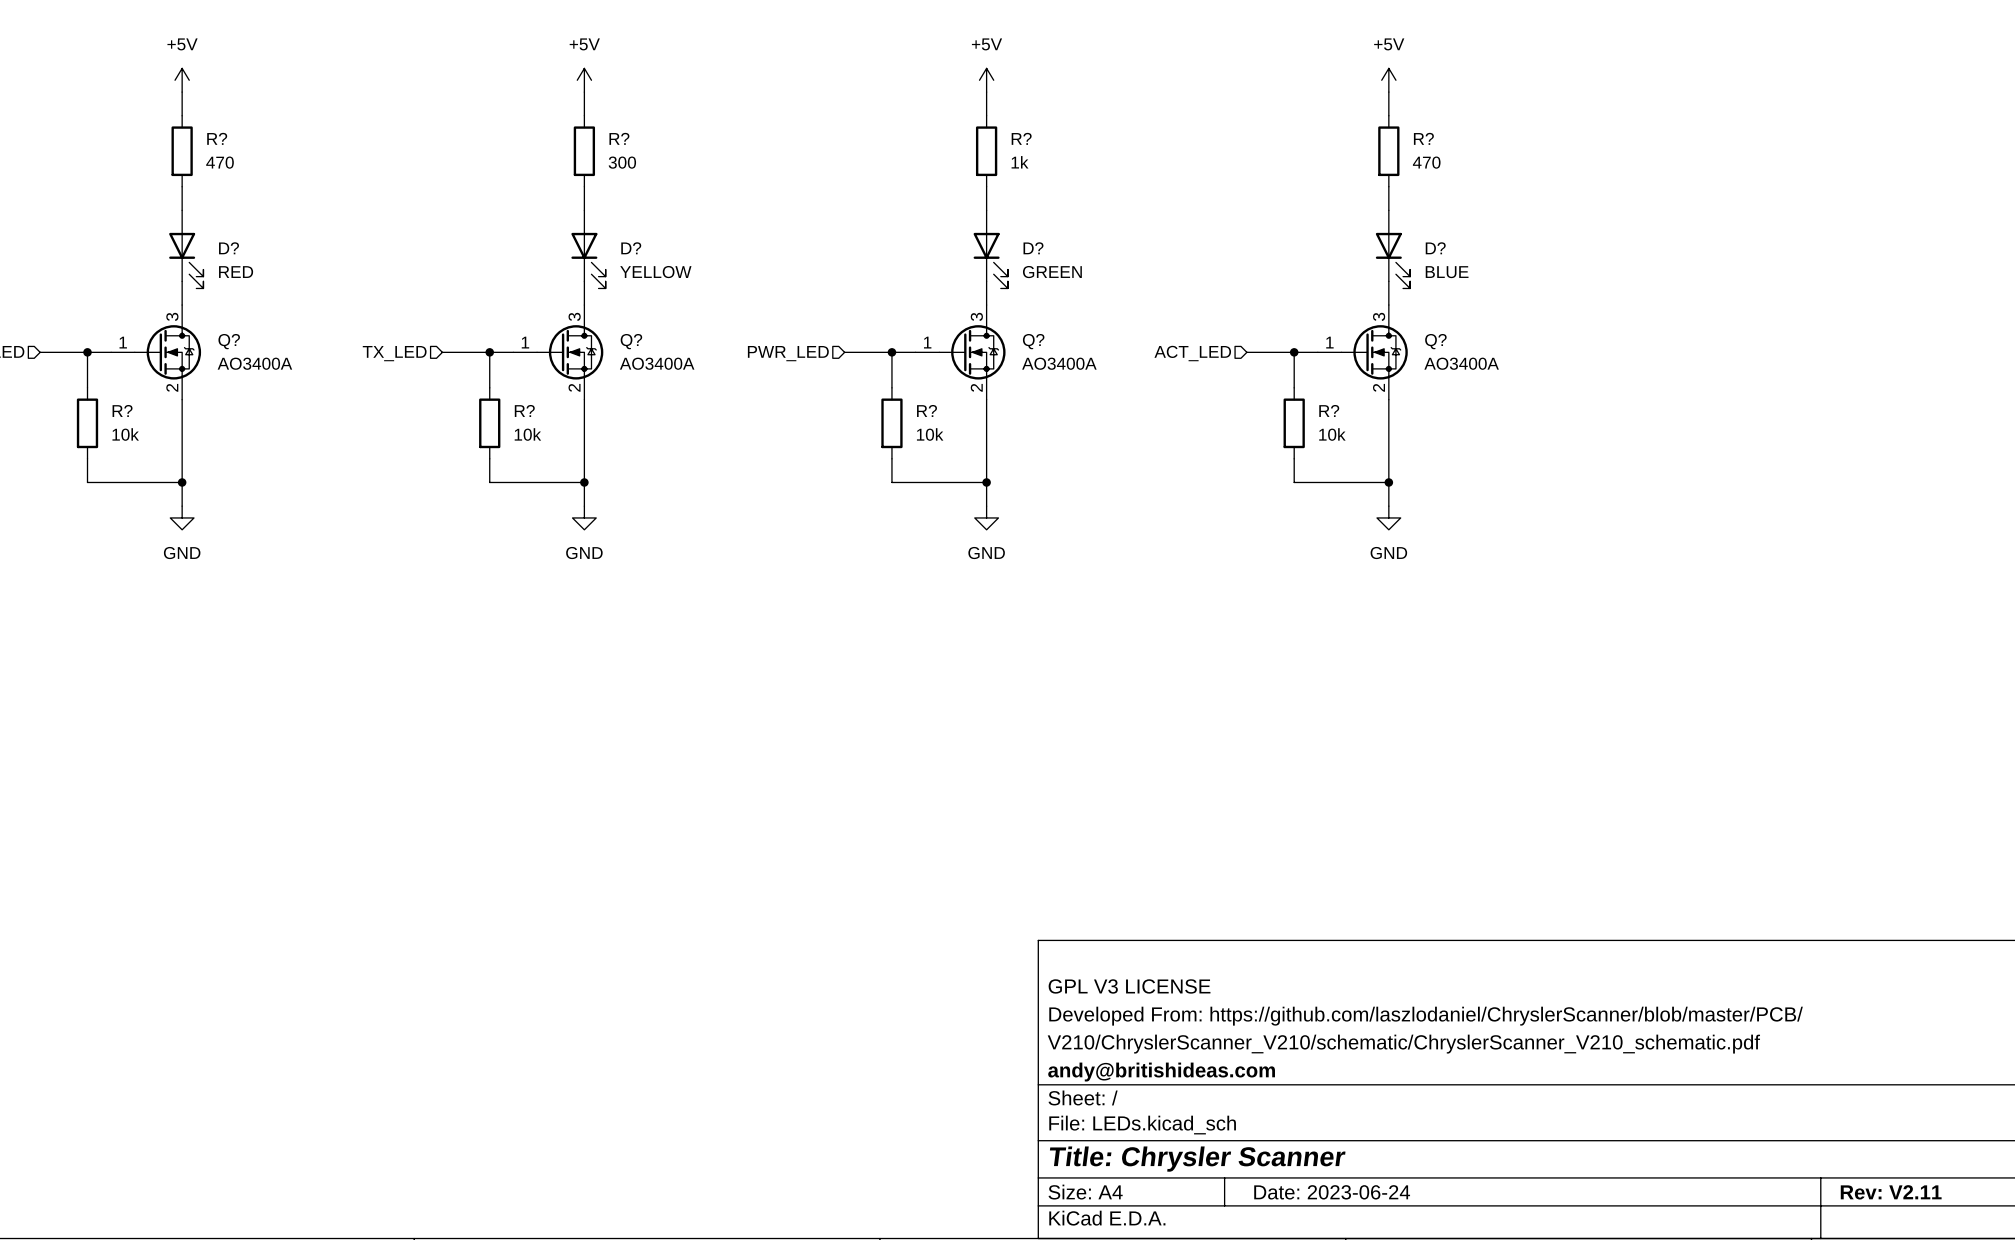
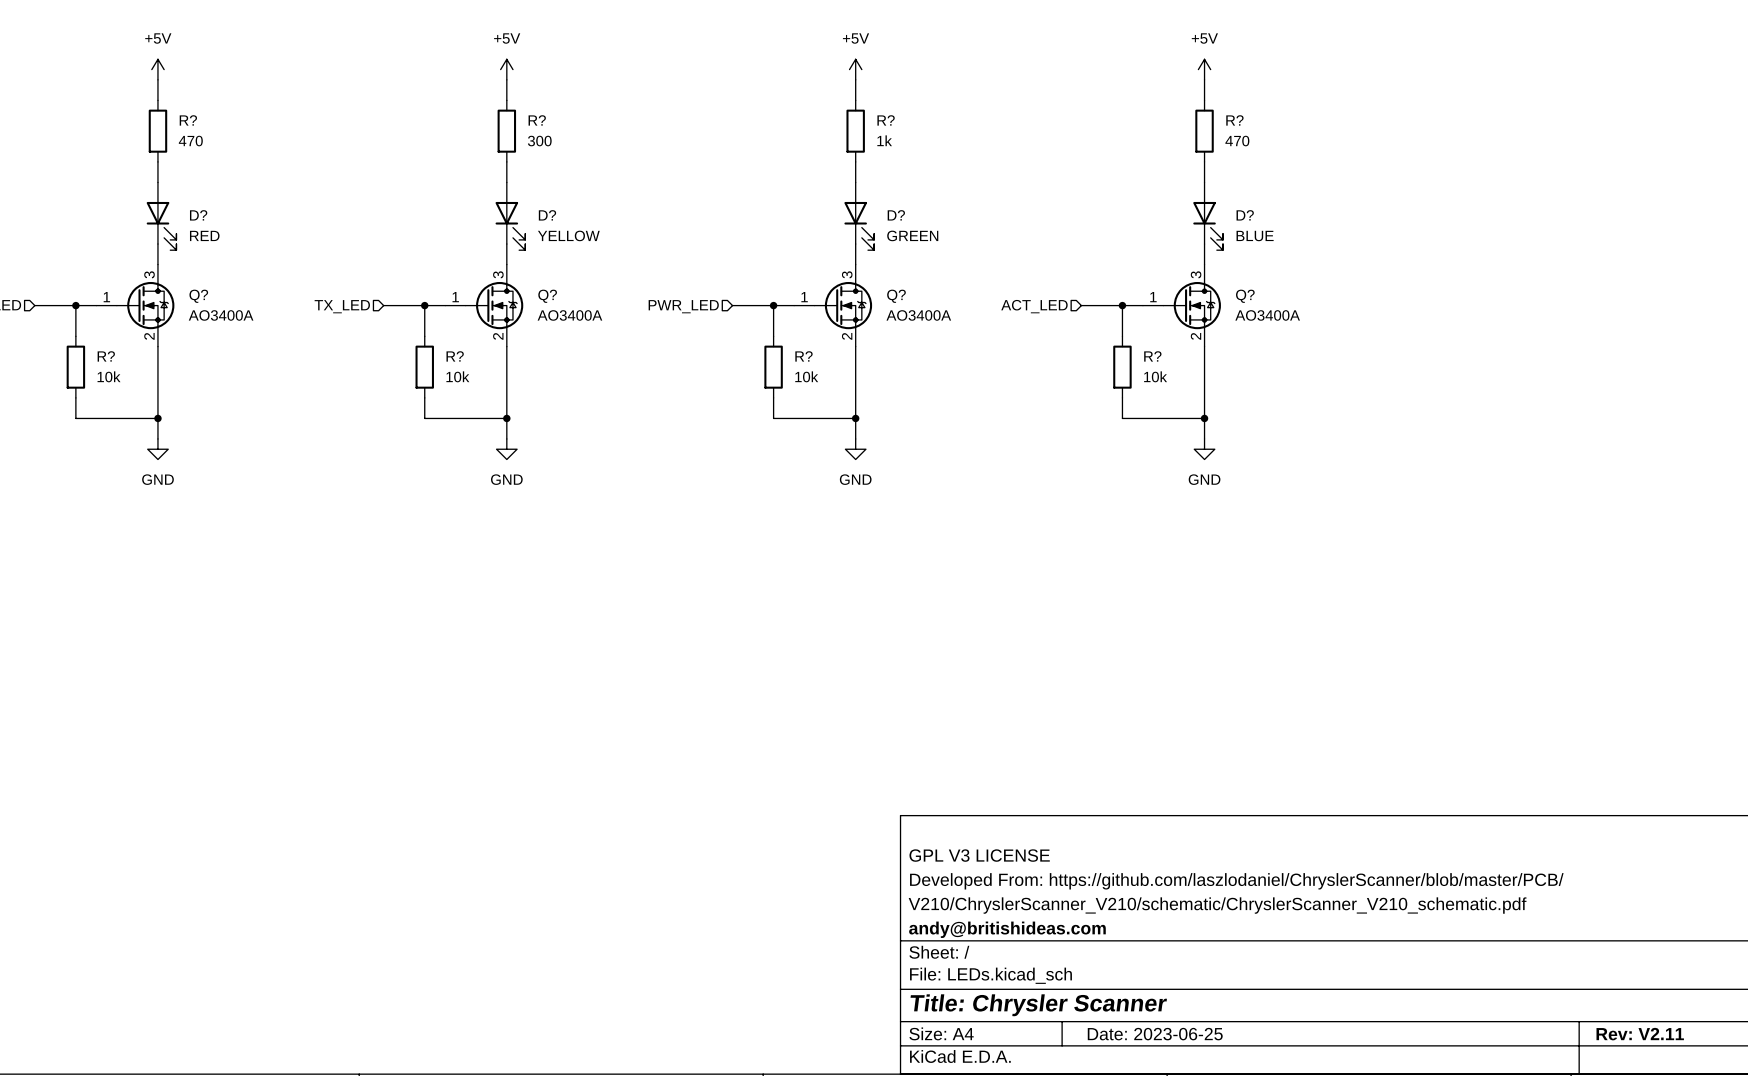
title block: Date: 2023-06-24 (1332, 1192) -> Date: 2023-06-25 (1155, 1034)

